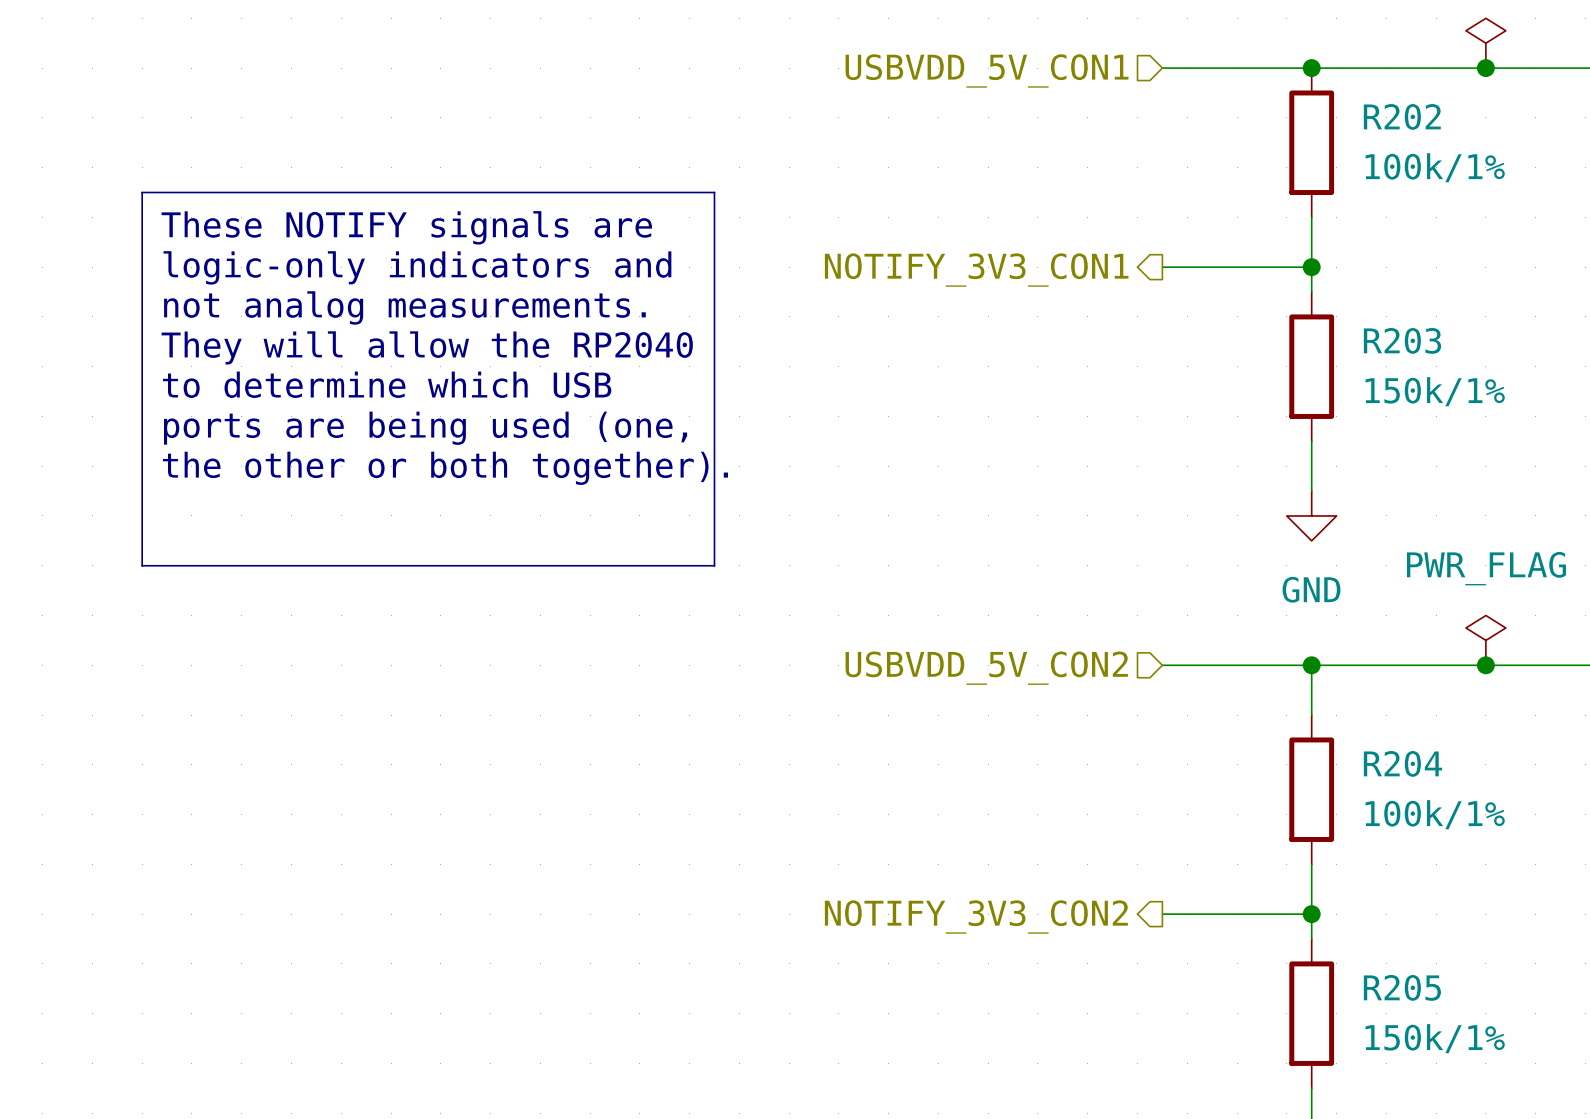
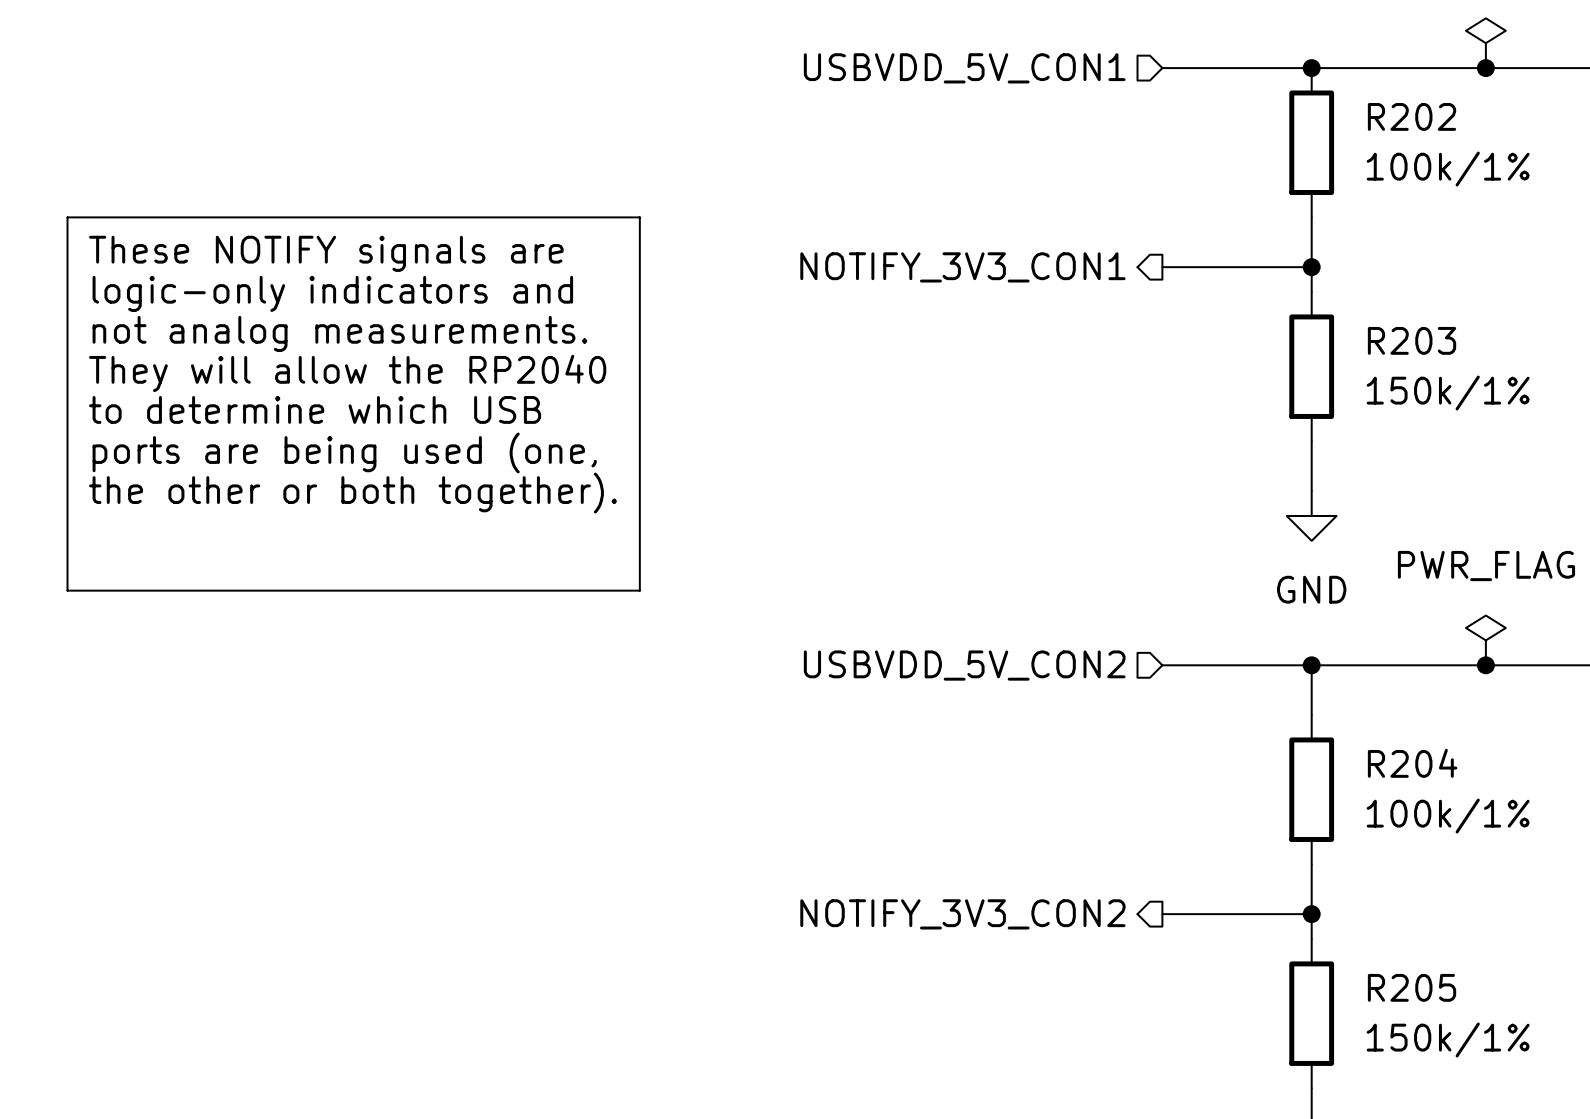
line: (142, 192) (714, 192) (714, 565) (142, 565) (142, 192) -> (67, 217) (67, 590) (639, 590) (639, 217) (67, 217)
text position: These NOTIFY signals are (406, 227) -> These NOTIFY signals are (326, 253)
text position: logic-only indicators and (417, 267) -> logic-only indicators and (332, 293)
text position: not analog measurements. (404, 307) -> not analog measurements. (339, 333)
text position: They will allow the RP2040 (427, 347) -> They will allow the RP2040 (347, 373)
text position: to determine which USB (387, 384) -> to determine which USB (315, 409)
text position: ports are being used (one, (425, 428) -> ports are being used (one, (344, 452)
text position: the other or both together). (445, 468) -> the other or both together). (352, 493)

